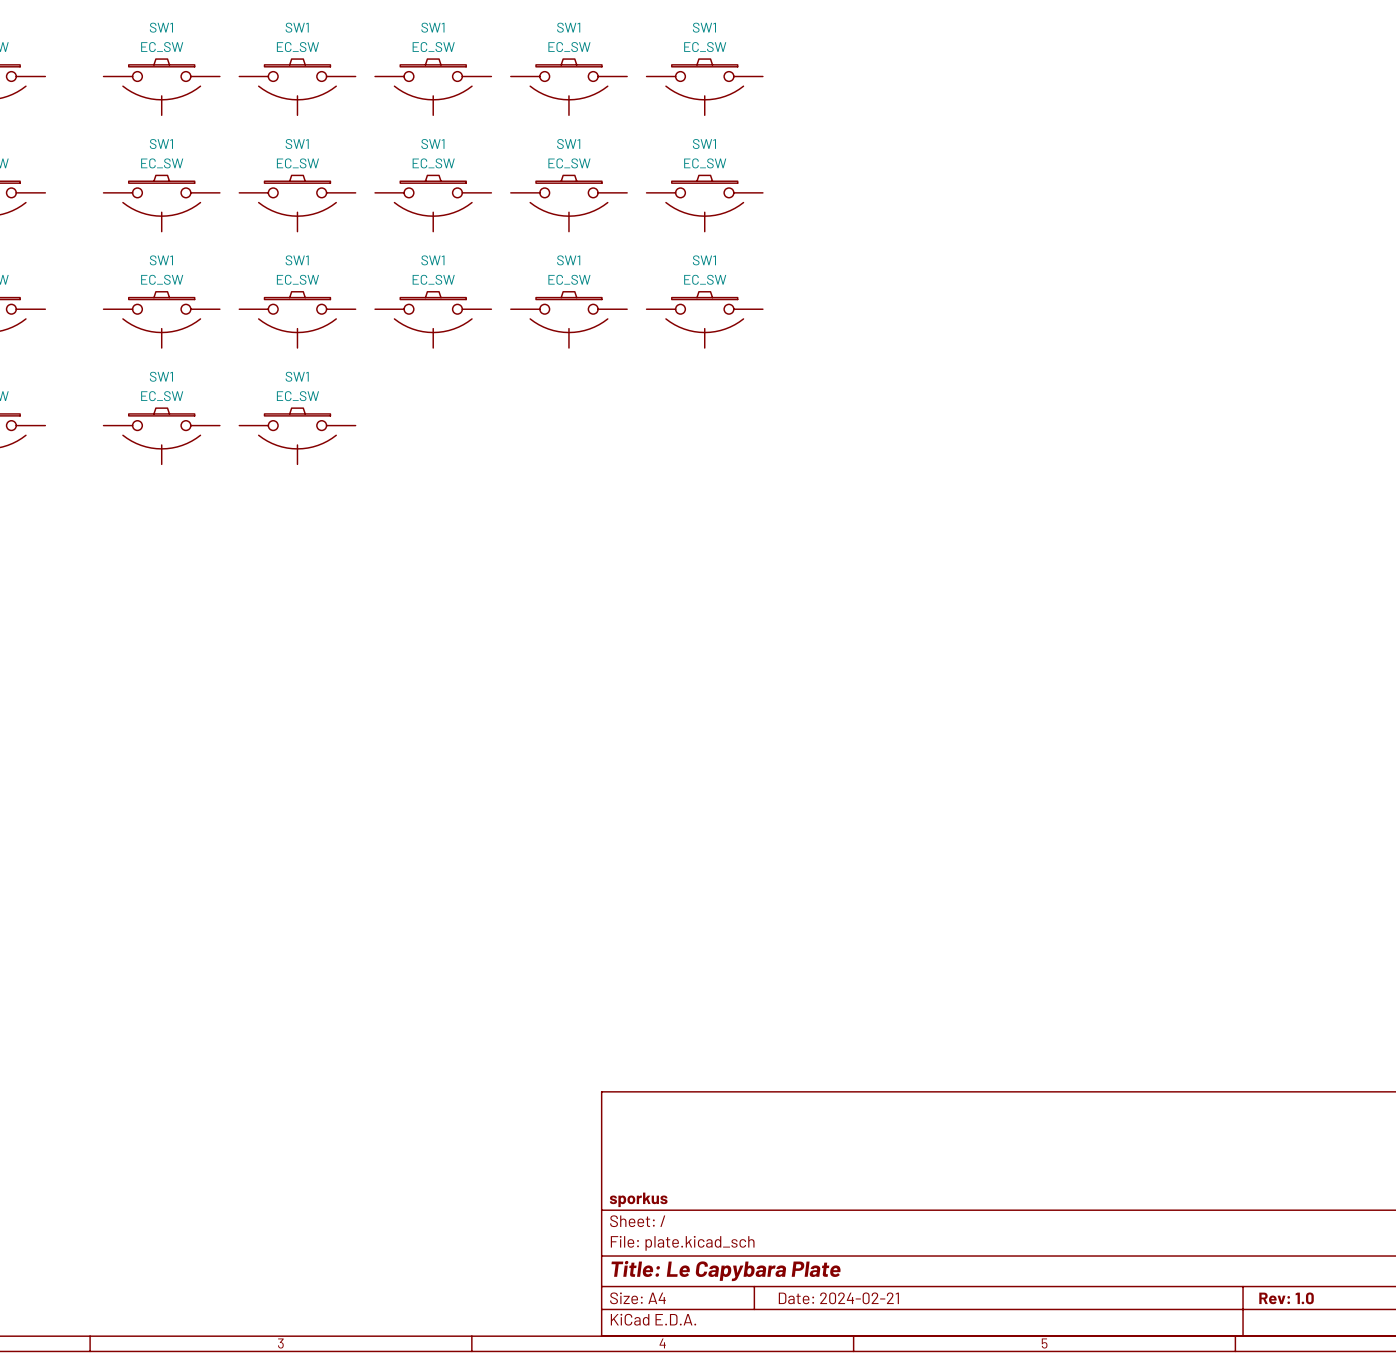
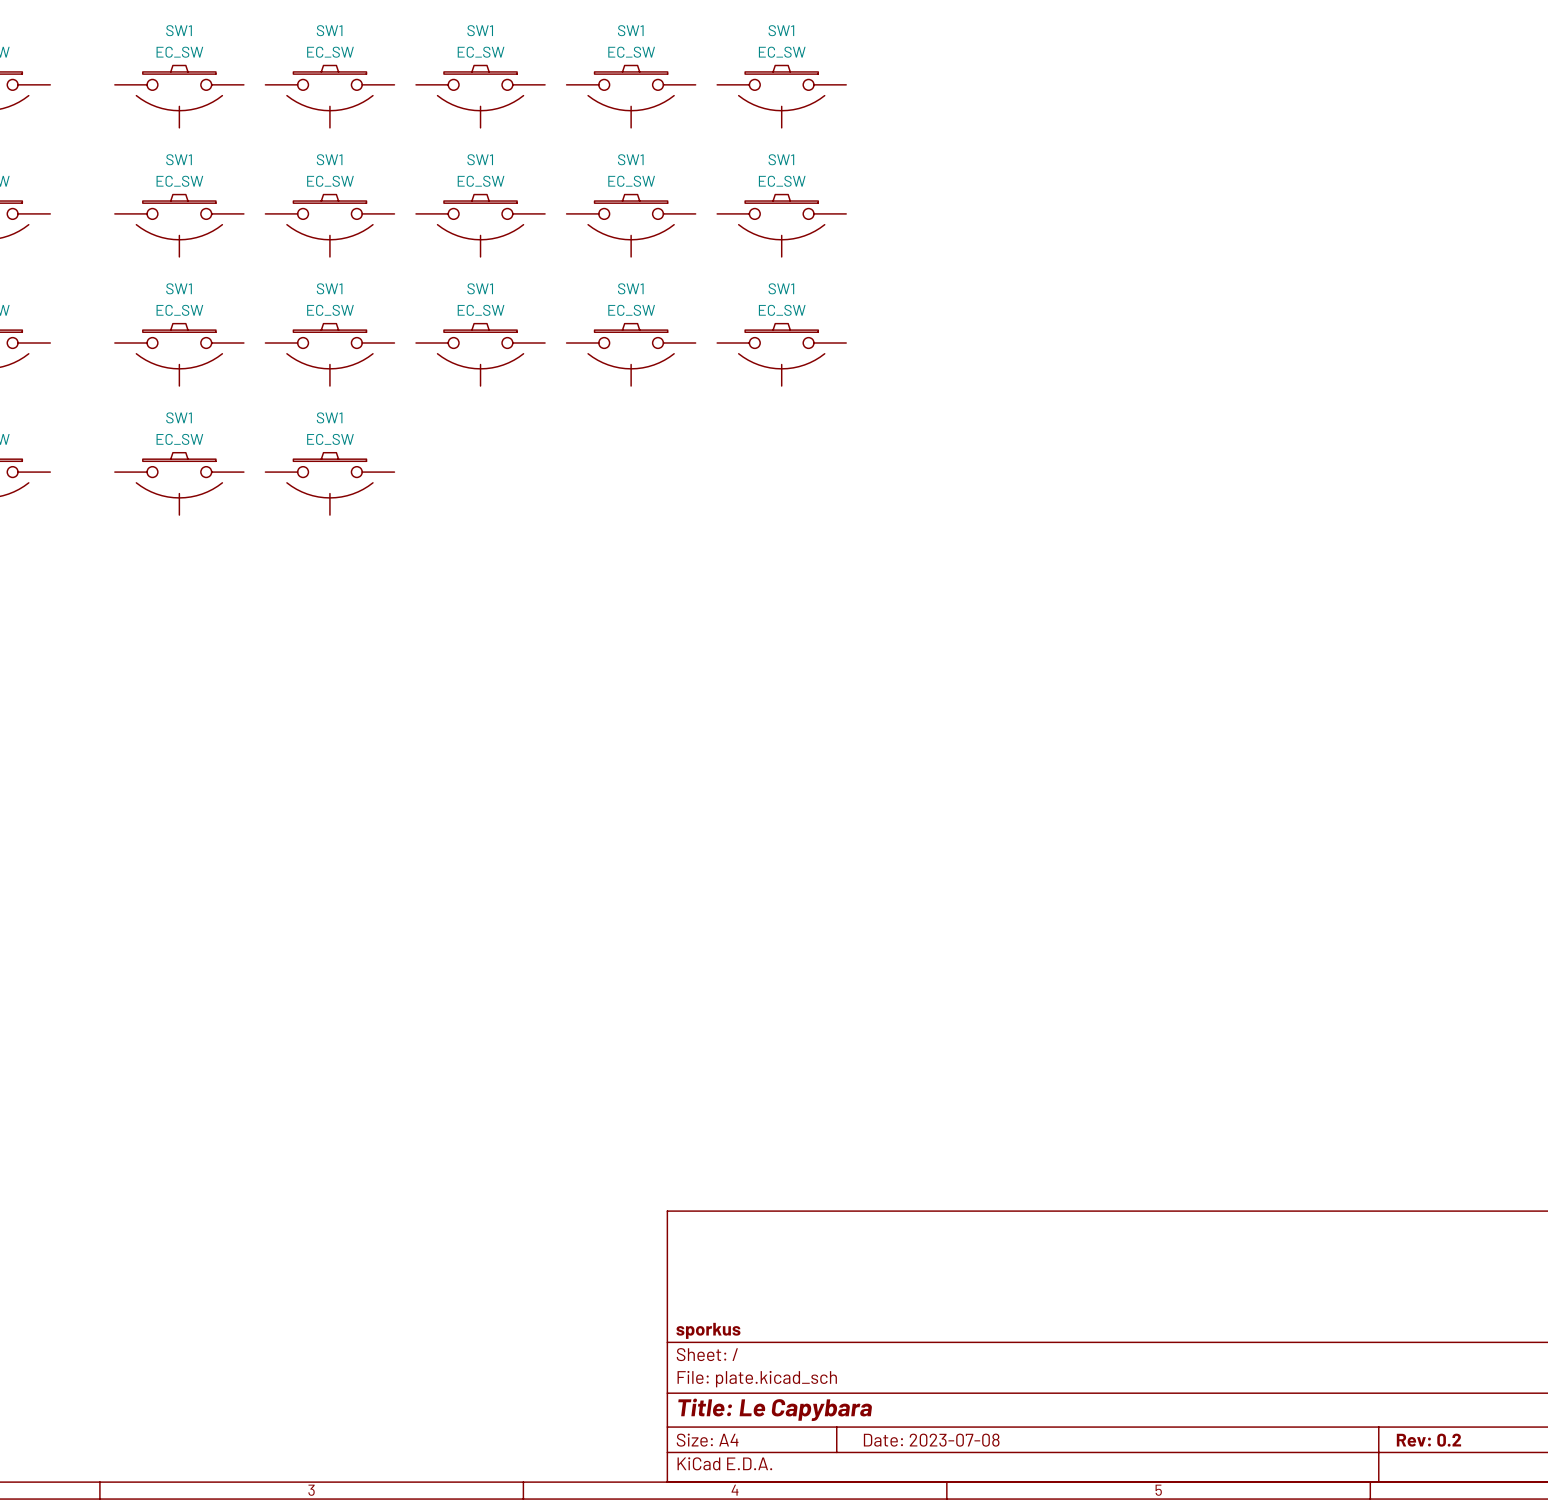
title block: Title: Le Capybara Plate (726, 1271) -> Title: Le Capybara (775, 1409)
title block: Date: 2024-02-21 (838, 1298) -> Date: 2023-07-08 (931, 1440)
title block: Rev: 1.0 (1286, 1298) -> Rev: 0.2 (1428, 1440)

